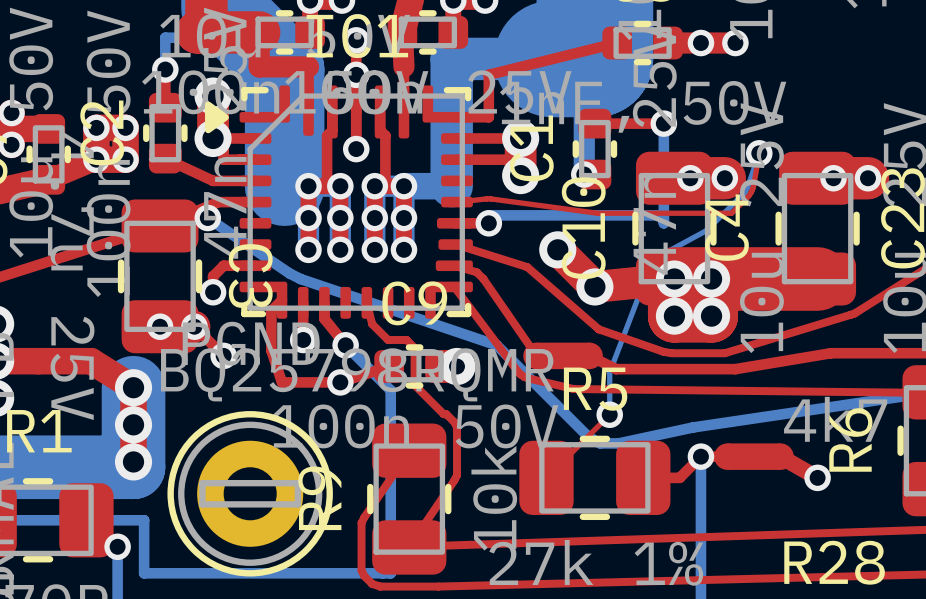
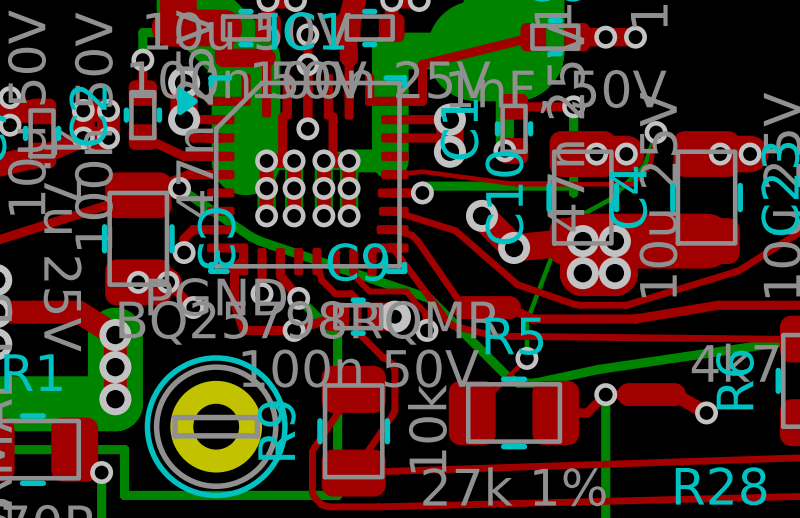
top track: none -> (353, 261) (353, 275) (369, 291) (406, 291) (424, 312) (427, 330)
via: none -> (427, 330)

